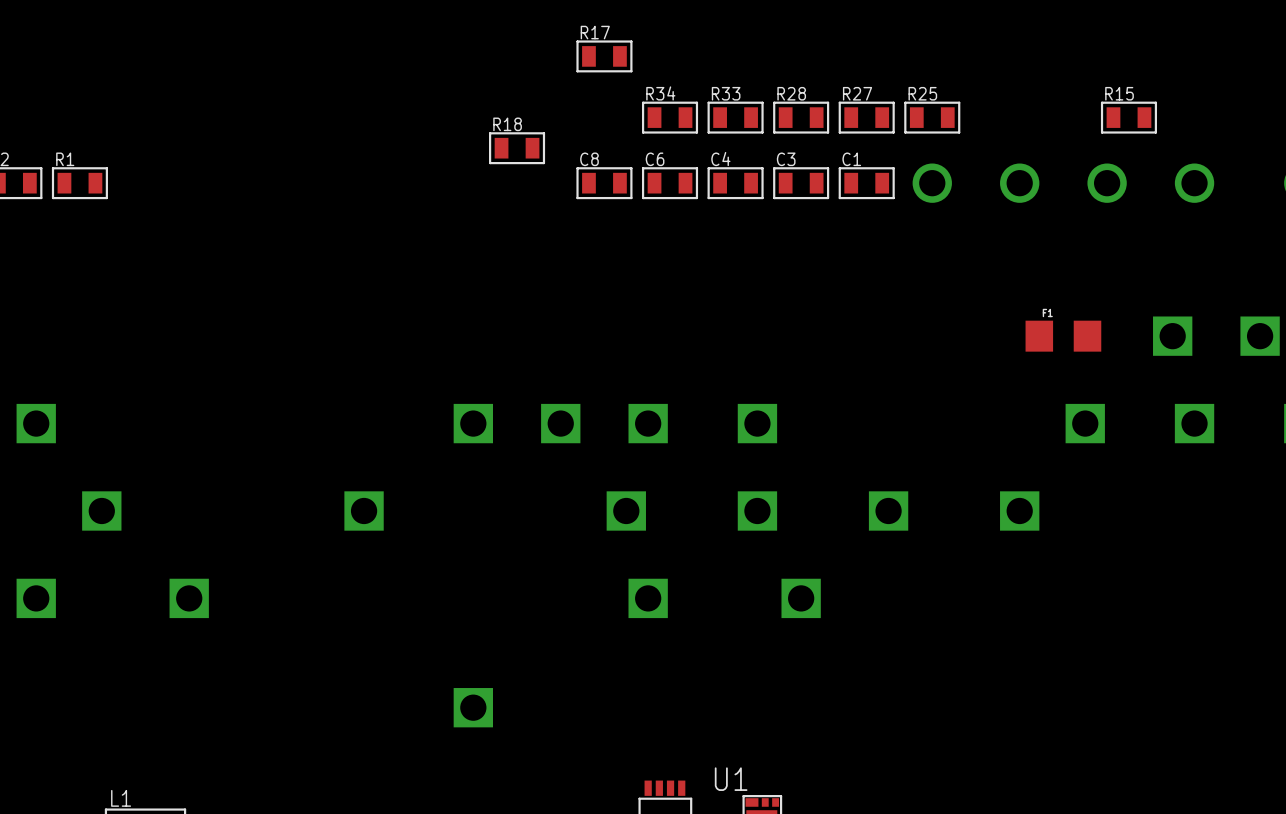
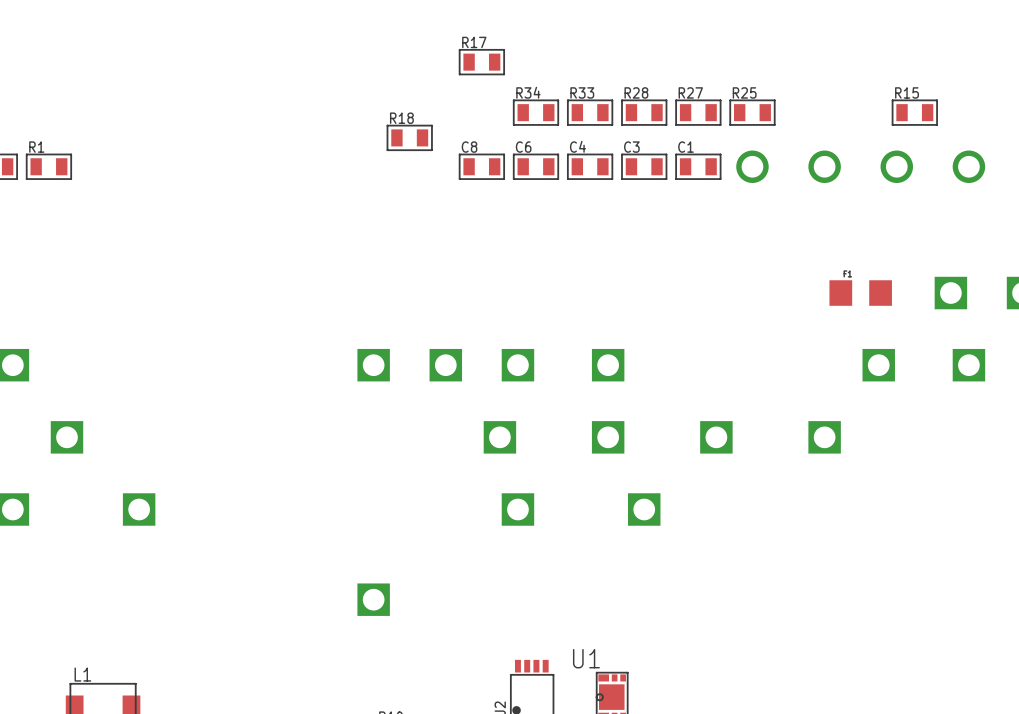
part: (364, 510) -> none

